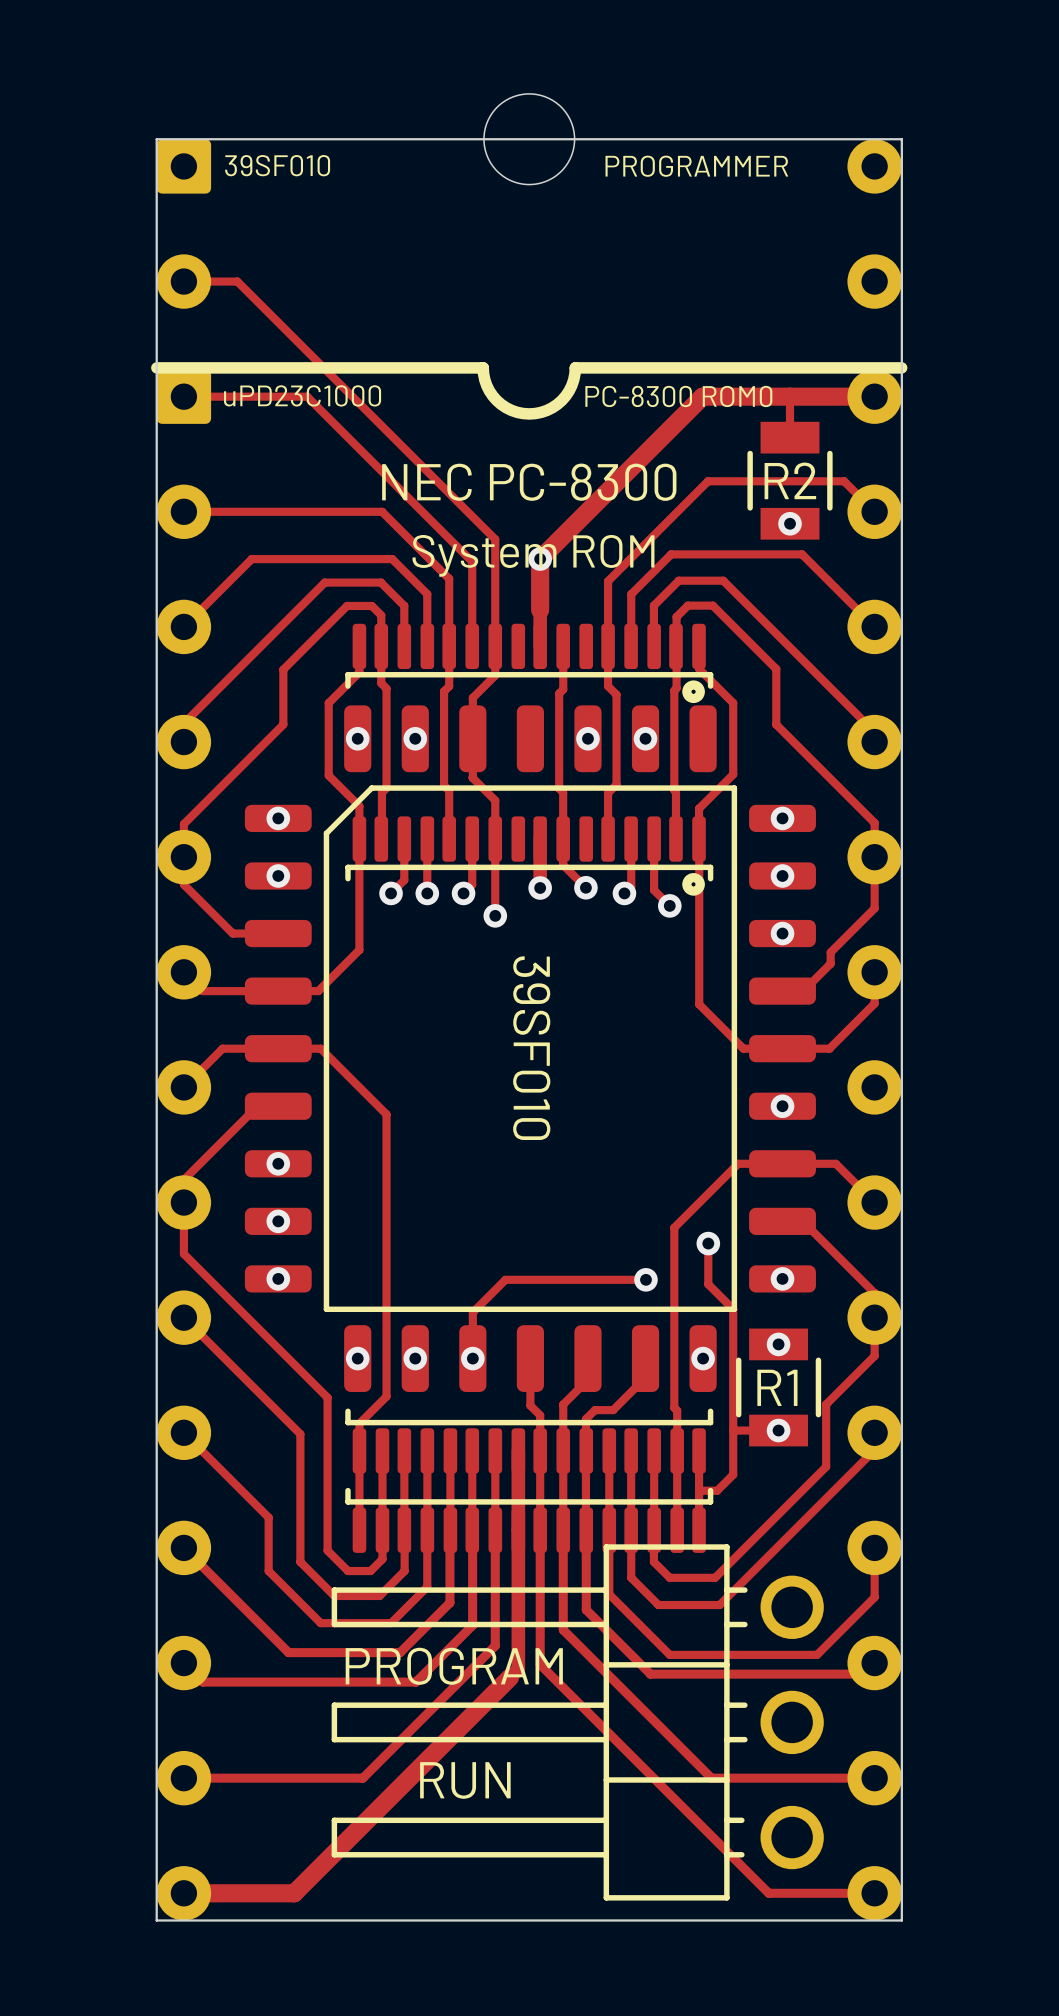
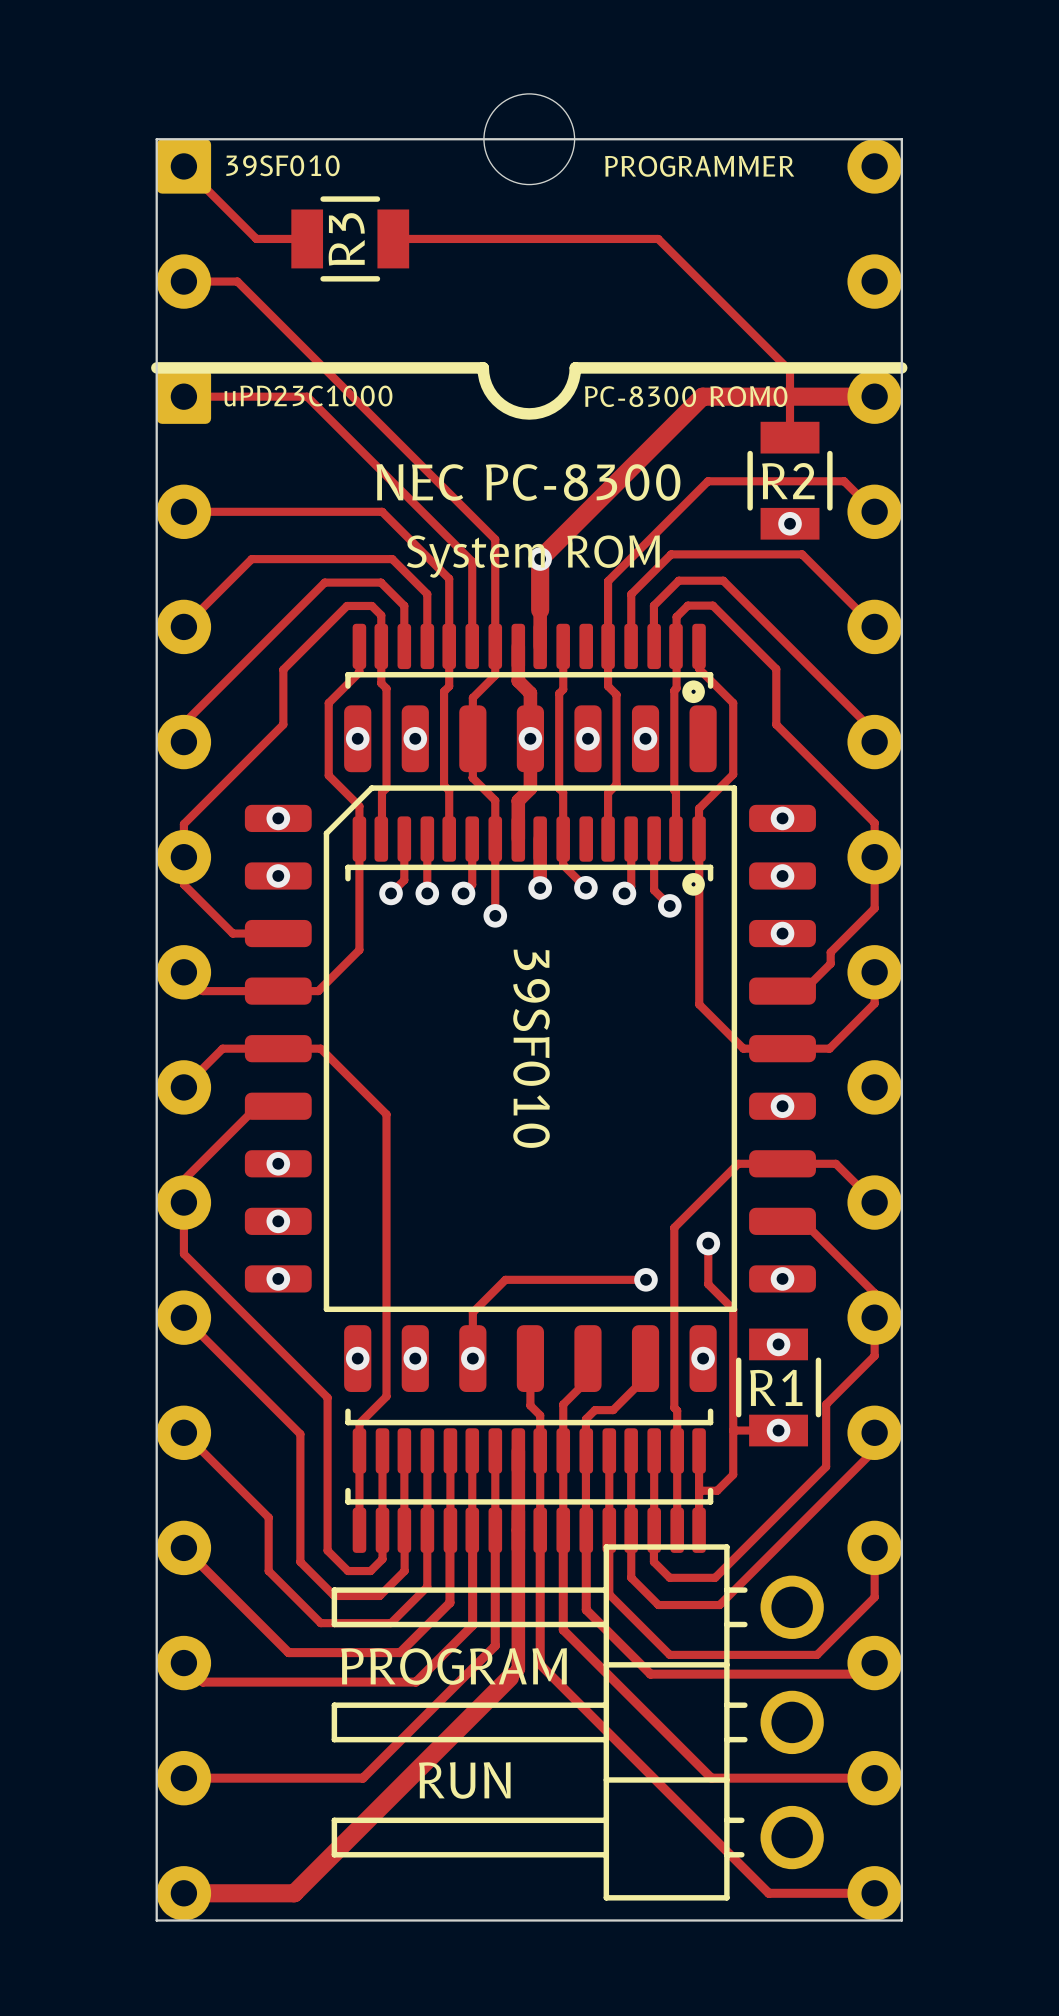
track: none -> (183, 166) (256, 238) (307, 238)
R3: none -> (350, 238)
track: none -> (393, 238) (658, 238) (790, 370) (790, 396)
track: none -> (518, 646) (518, 680) (530, 693) (530, 788) (518, 800) (518, 839)
via: none -> (530, 738)

